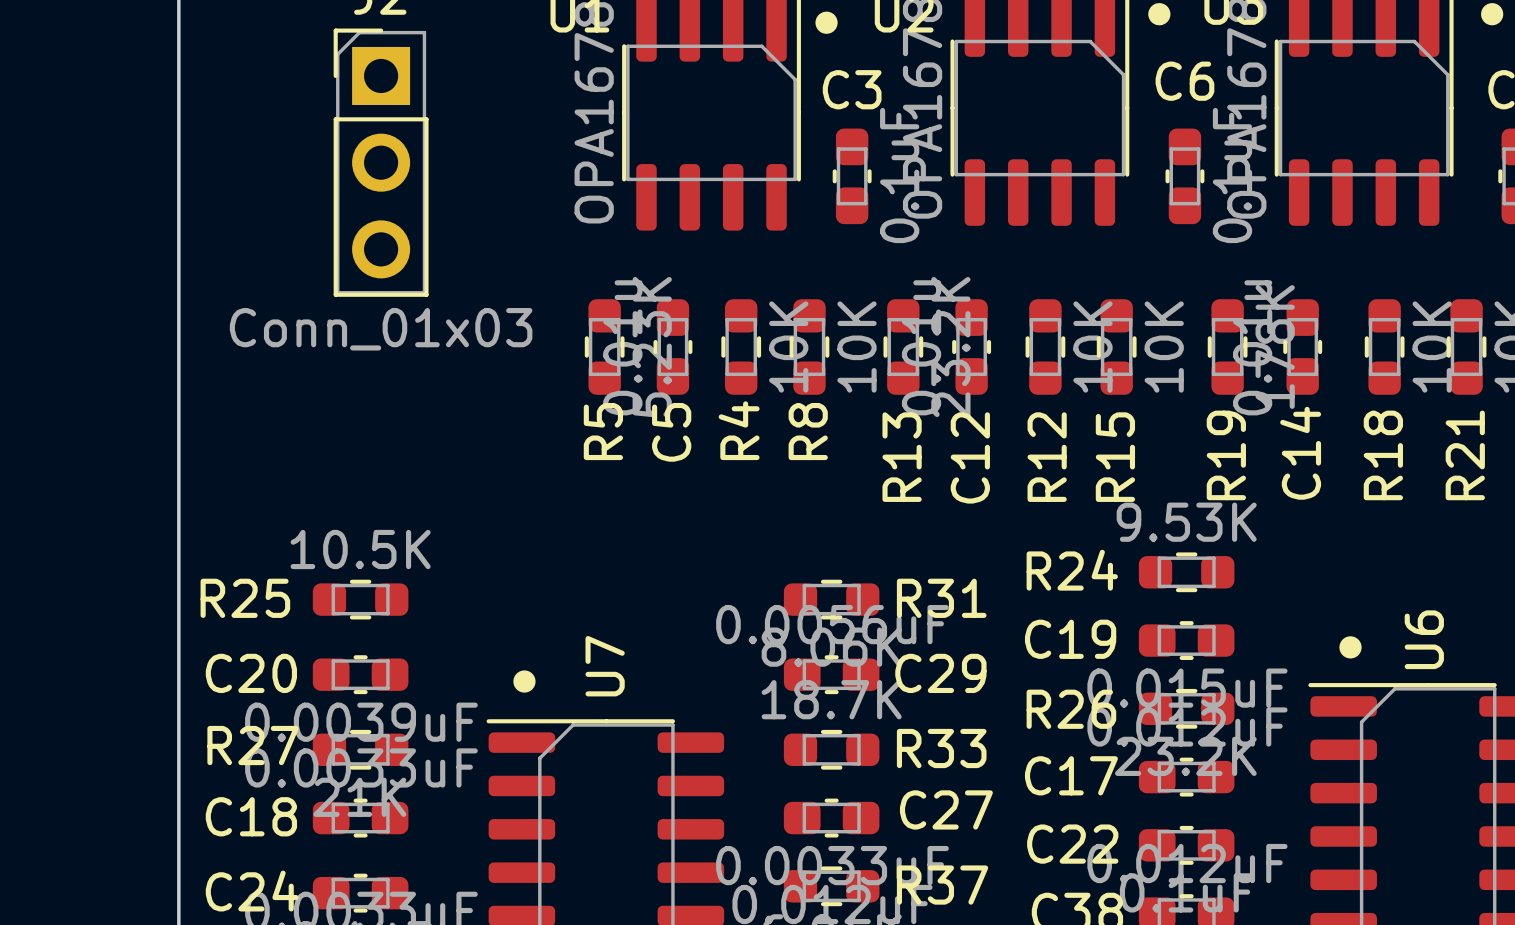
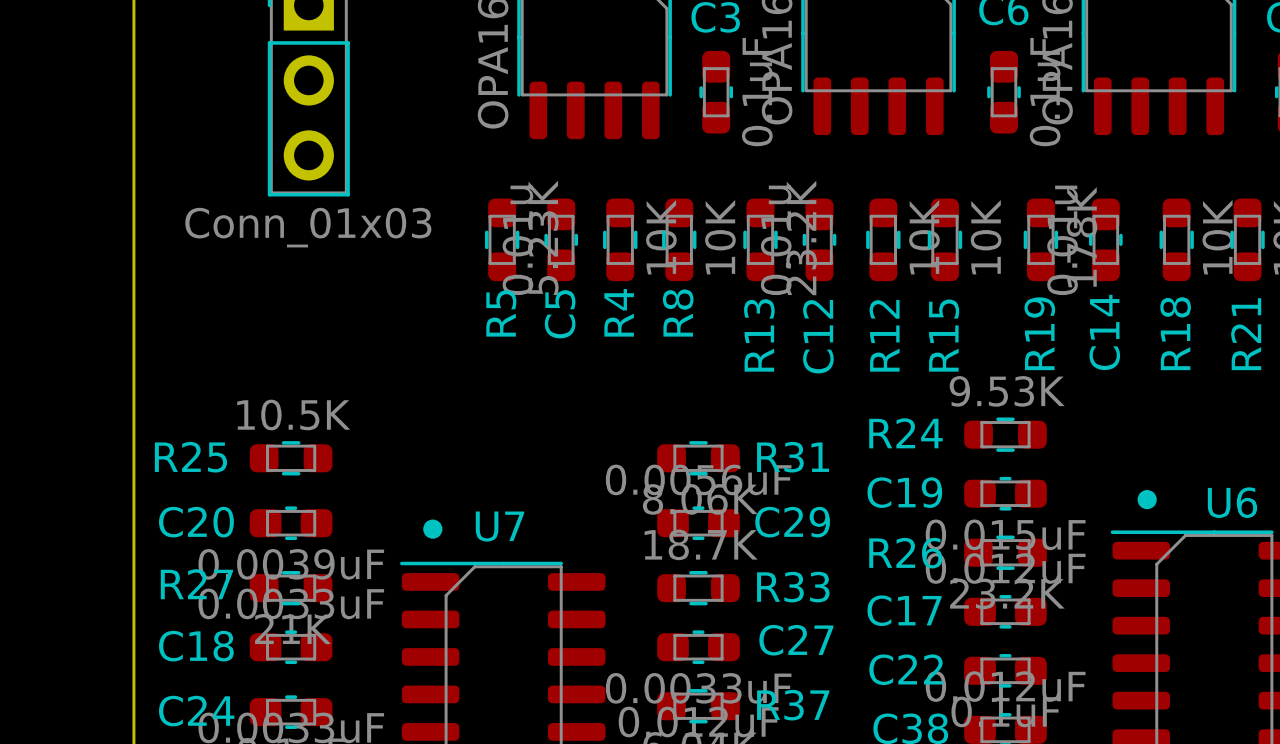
U6 name rotation: 0° (1424, 639) -> 90° clockwise (1232, 502)
U7 name rotation: 0° (605, 666) -> 90° clockwise (499, 526)

